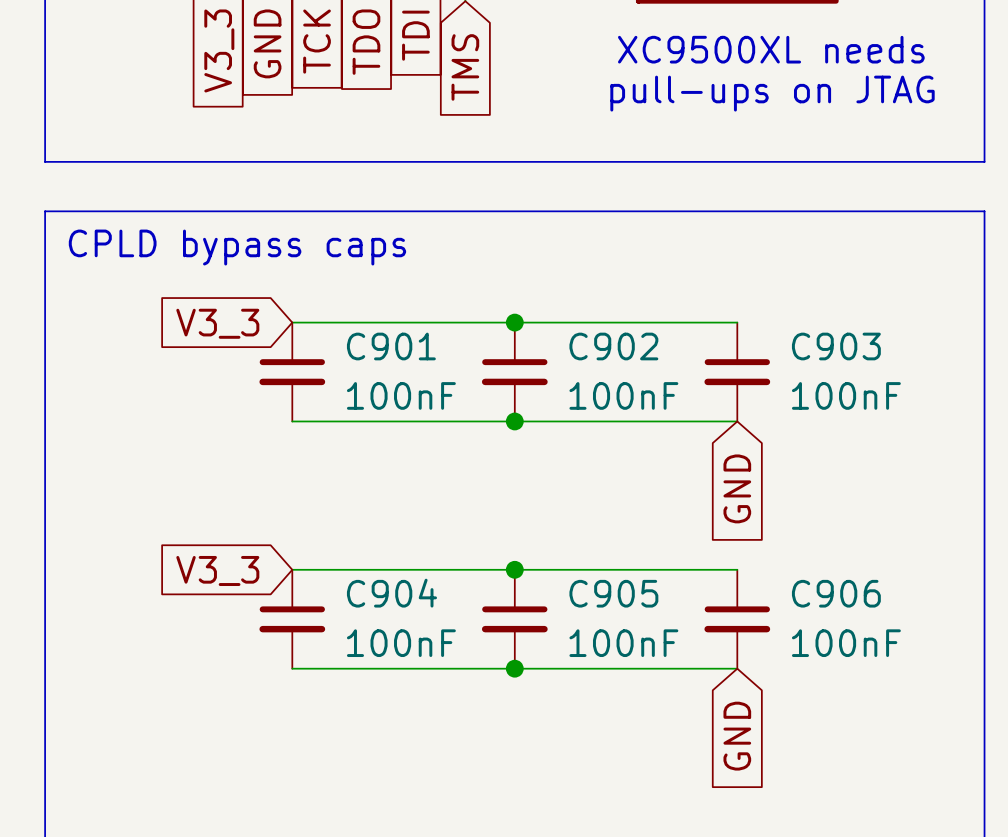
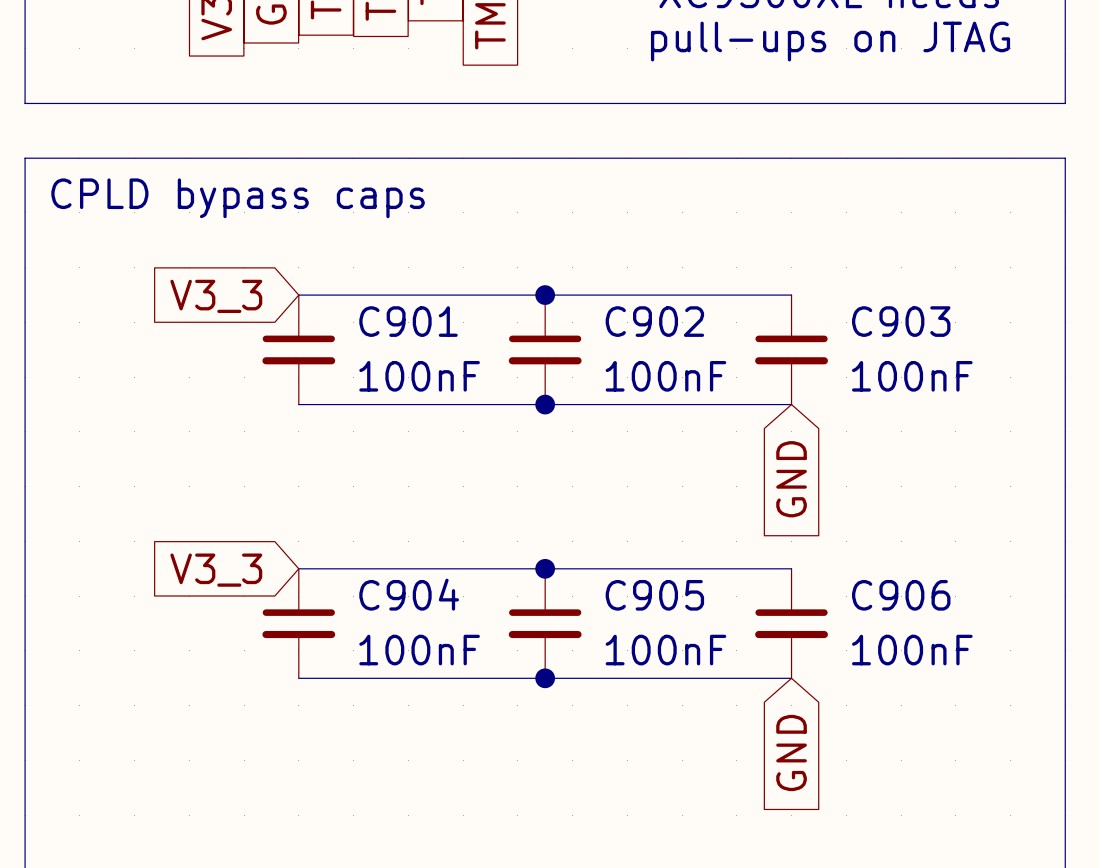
line: (45, 149) (45, 161) (984, 161) (984, 149) -> (25, 103) (1065, 103)
line: (45, 211) (984, 211) -> (25, 171) (25, 158) (1065, 158) (1065, 171)
text position: CPLD bypass caps (237, 247) -> CPLD bypass caps (238, 198)

